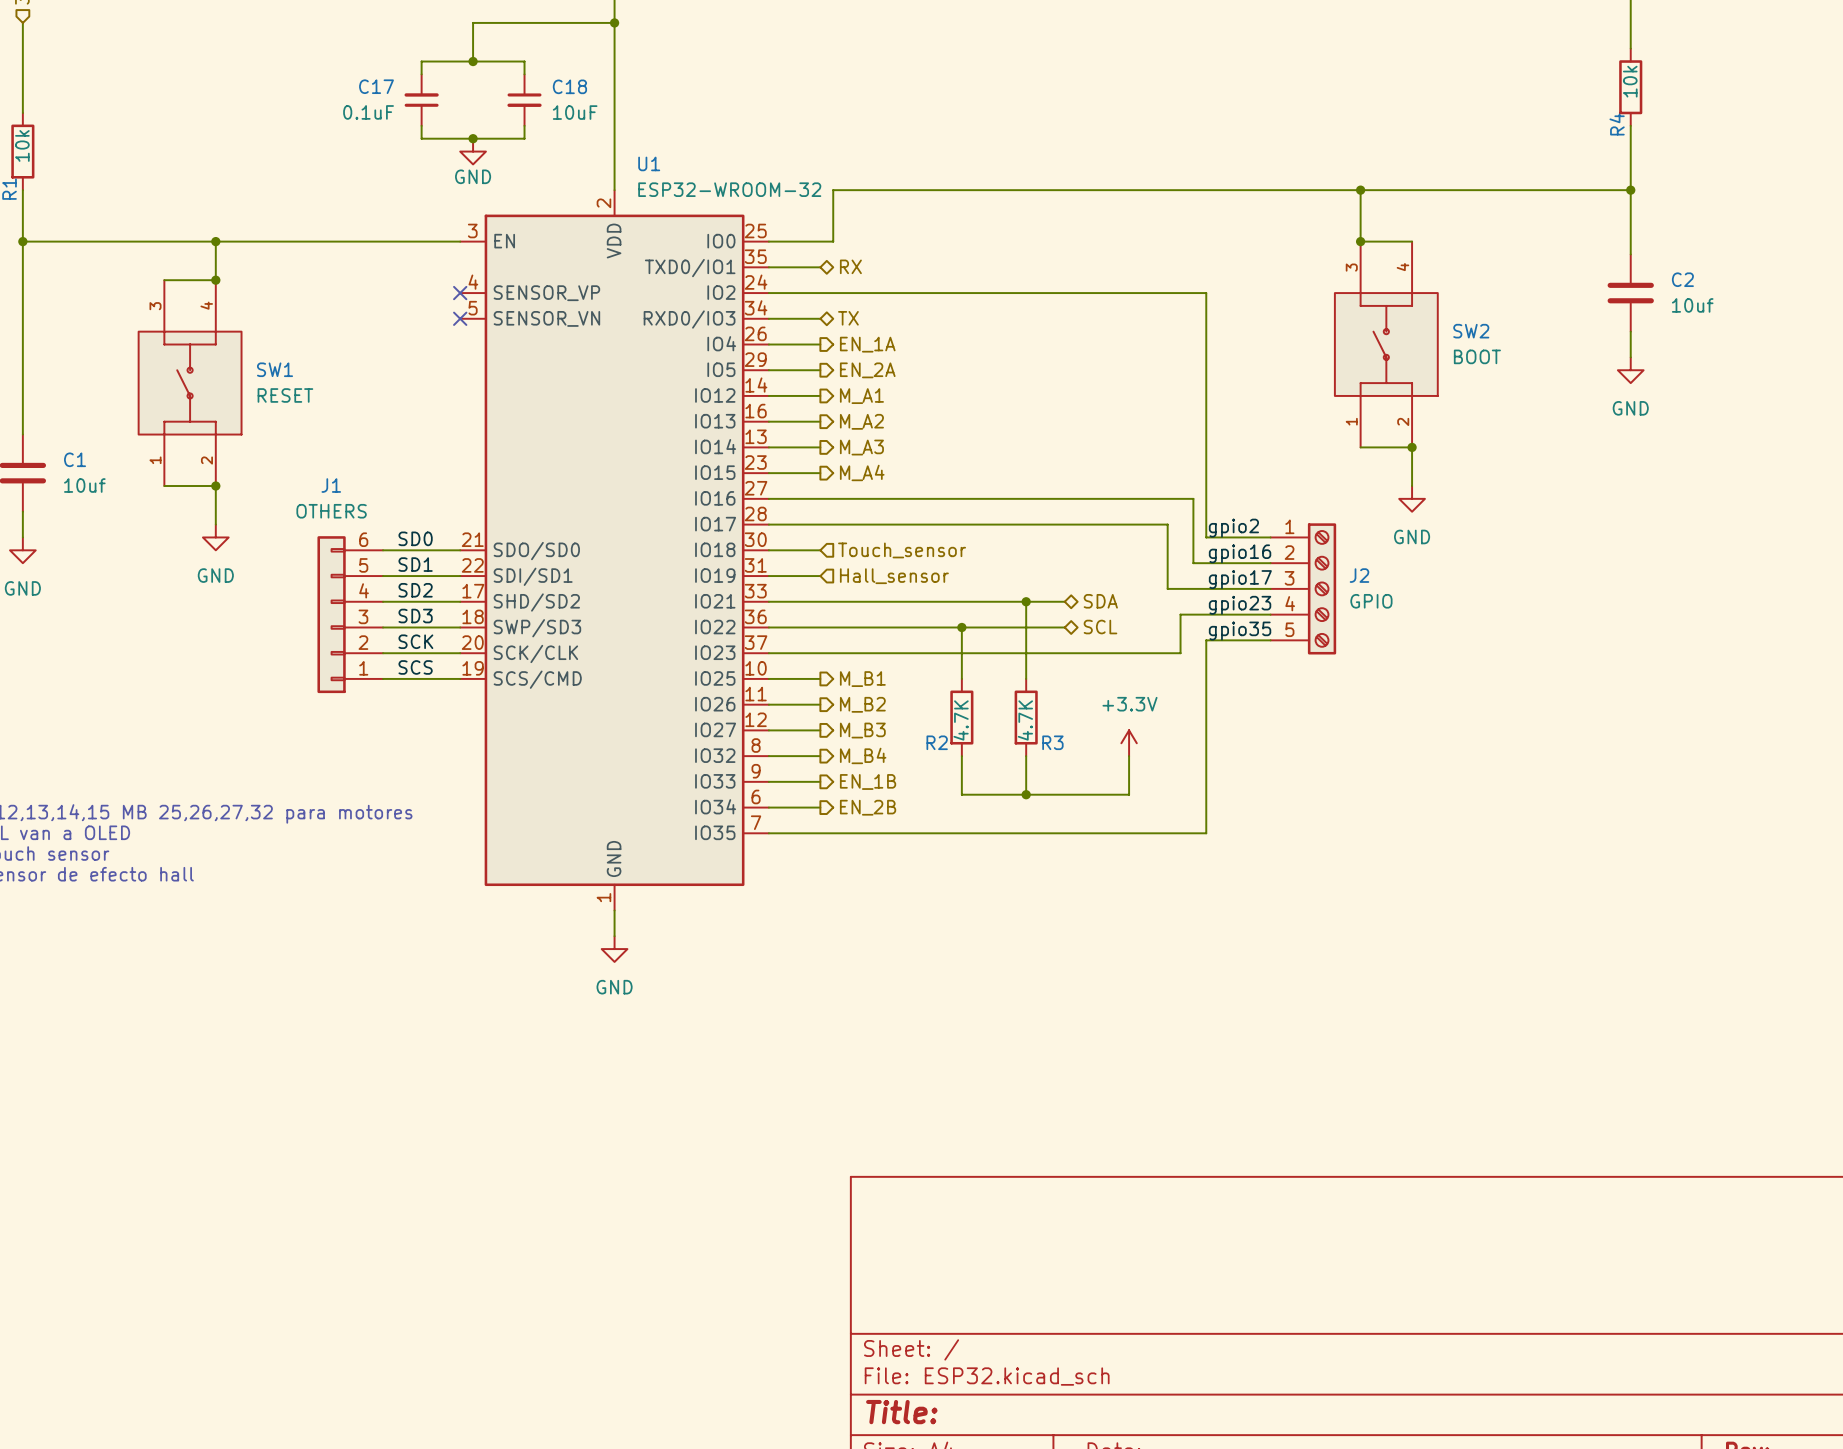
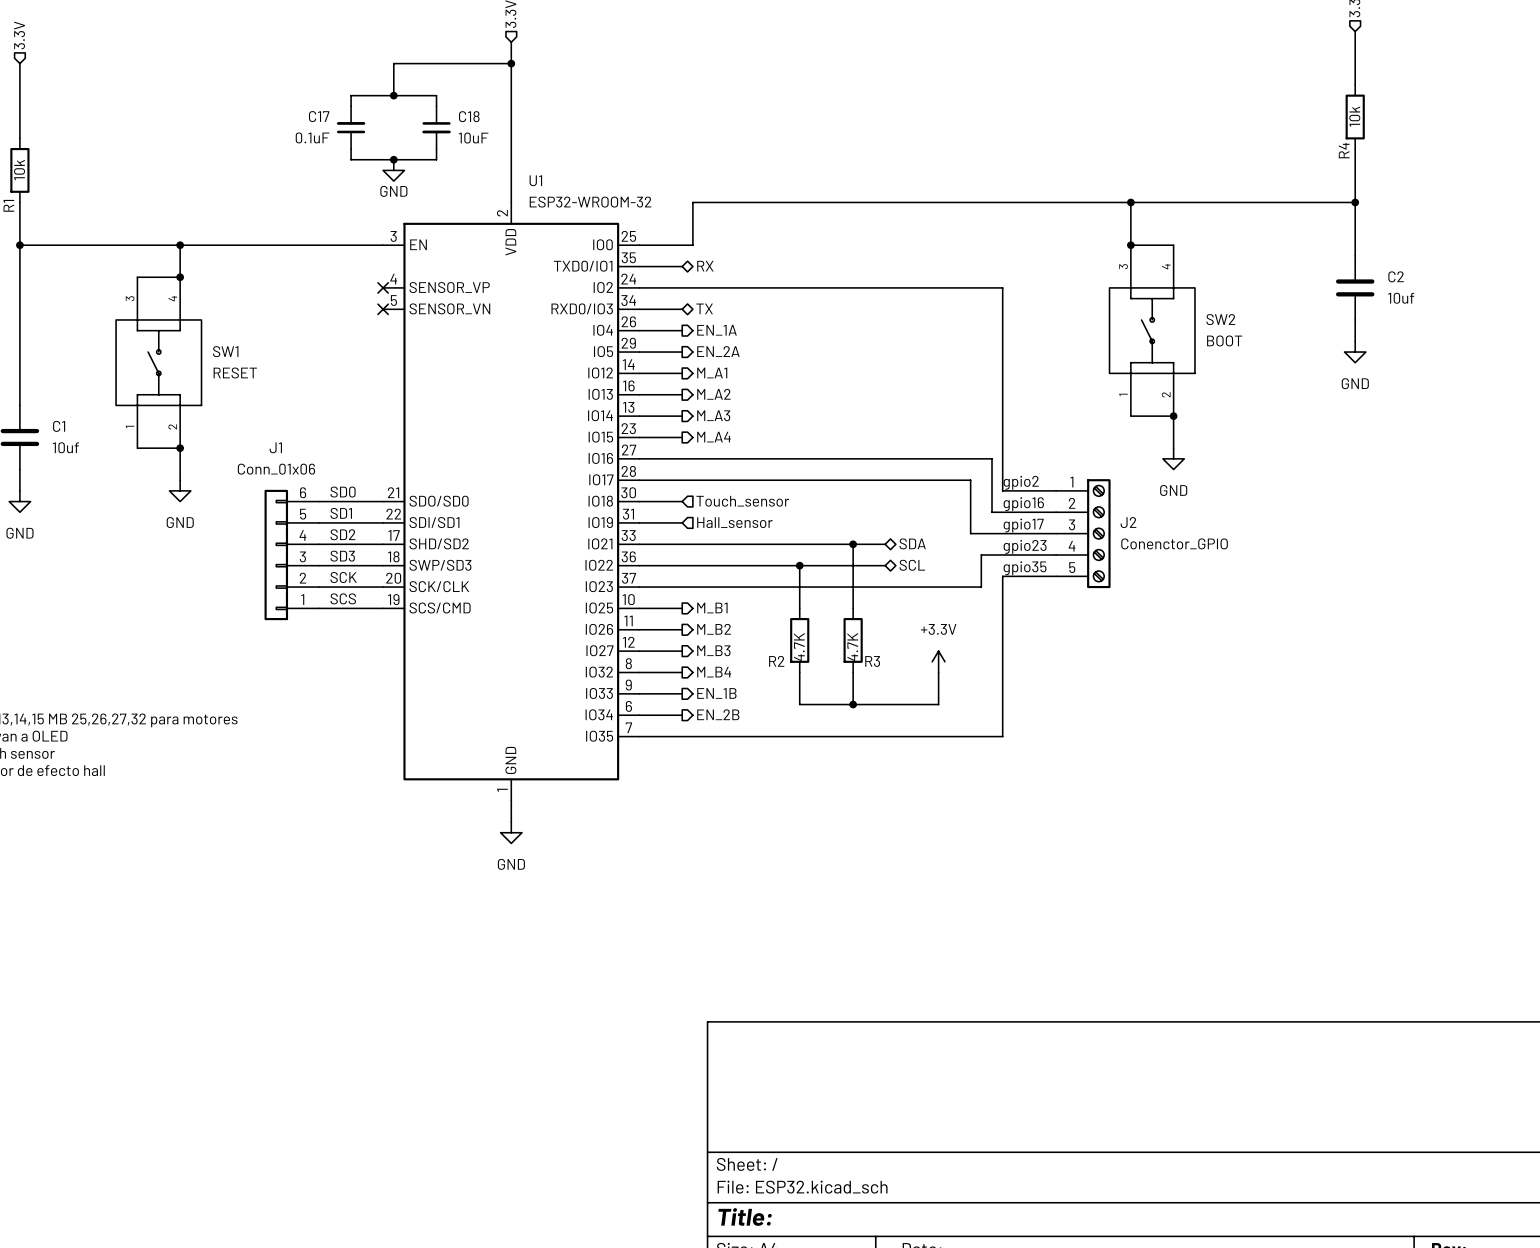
J1 value: OTHERS (331, 511) -> Conn_01x06 (276, 469)
J2 value: GPIO (1371, 601) -> Conenctor_GPIO (1174, 543)

